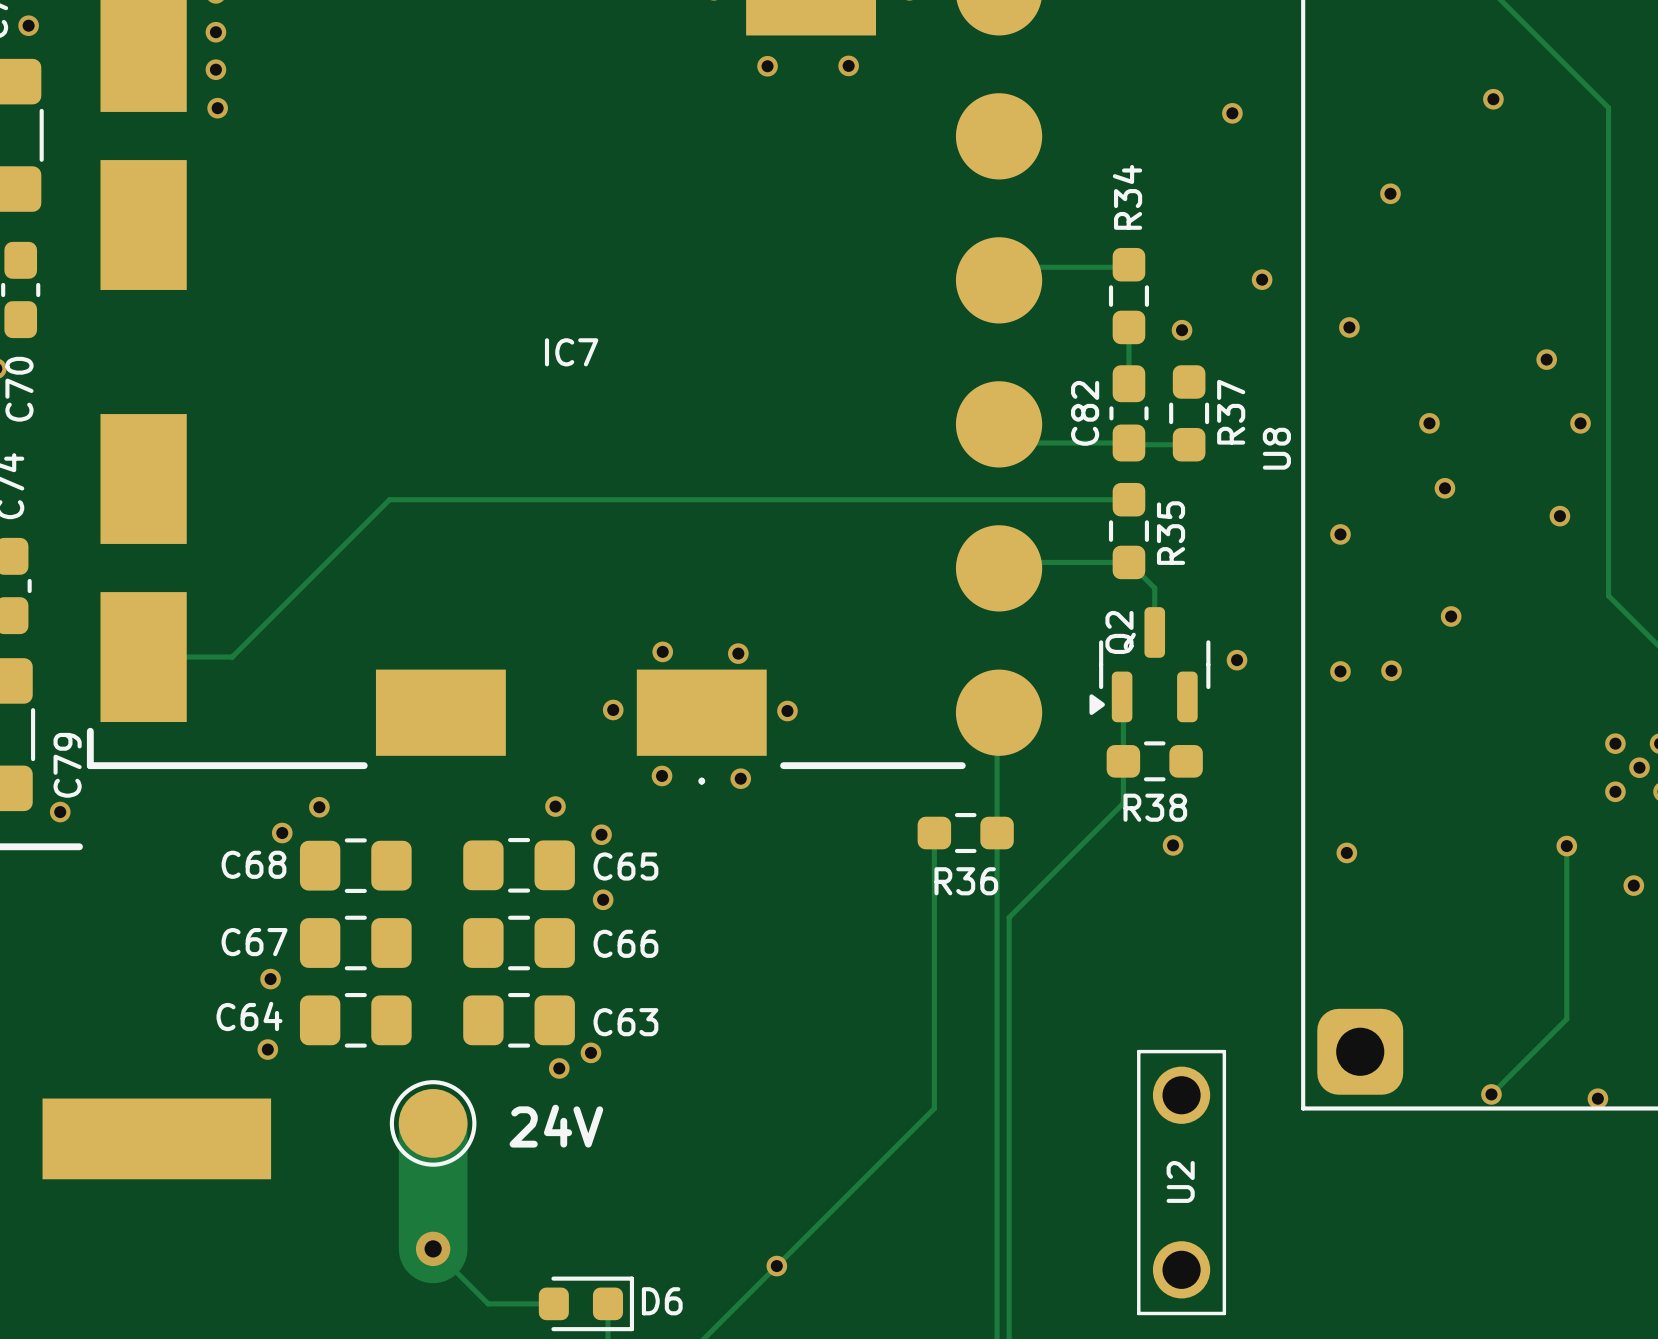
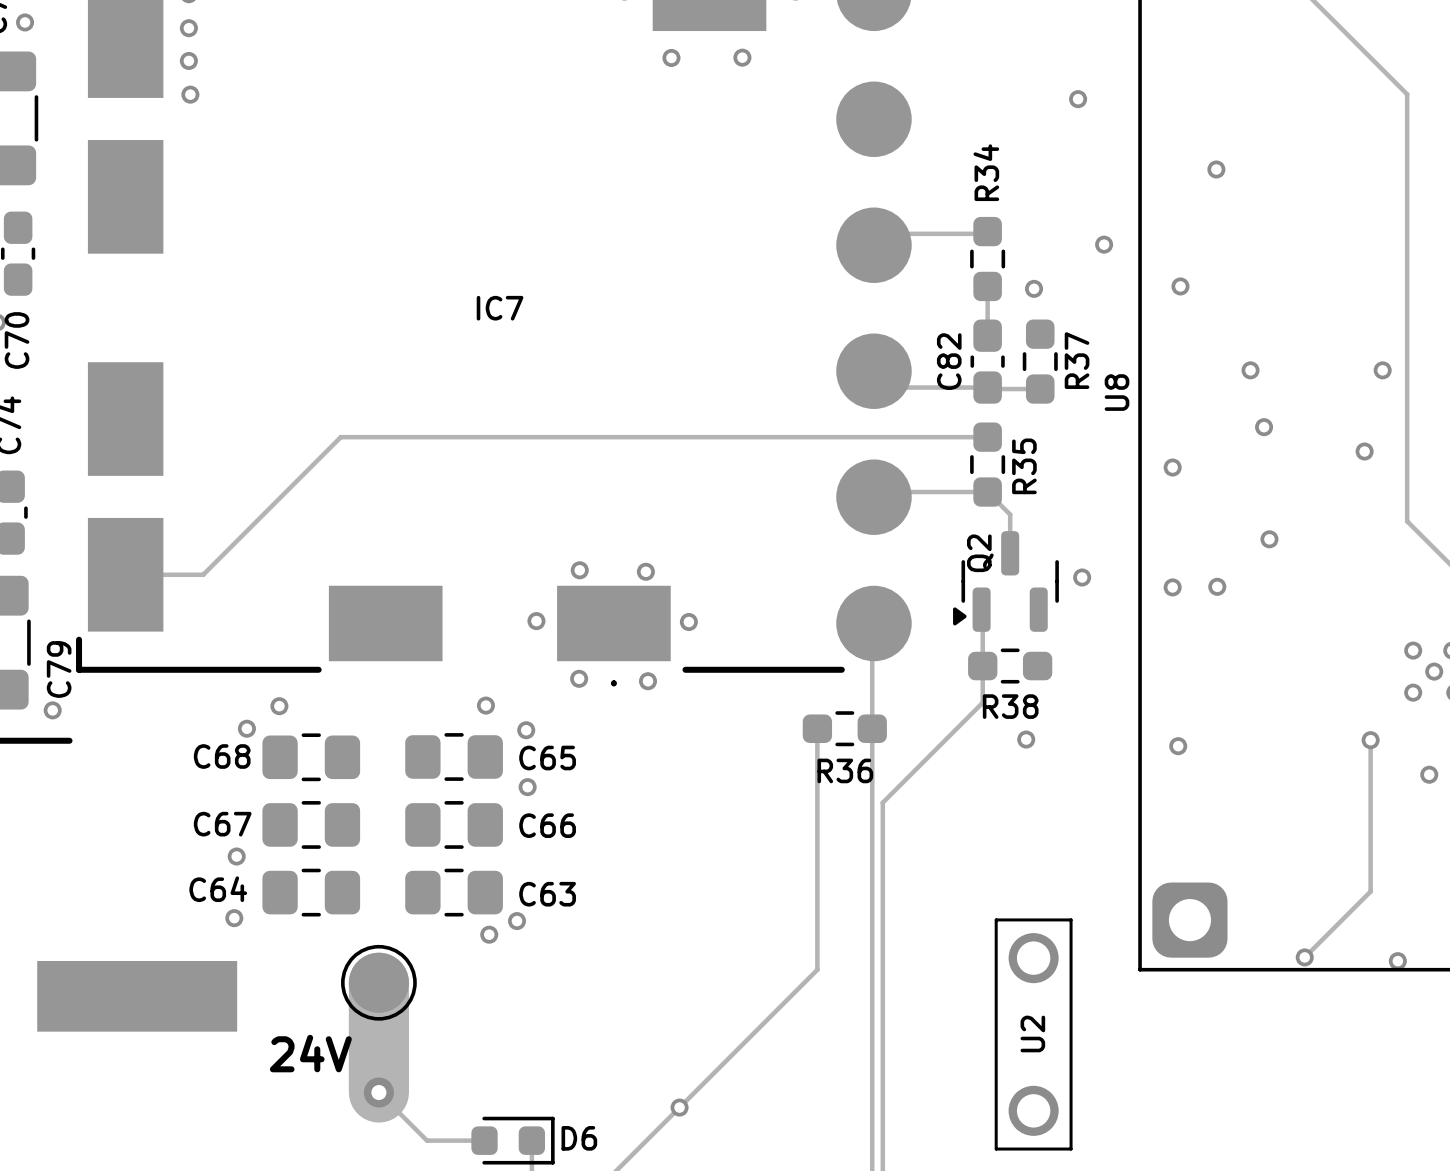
via: (1493, 99) -> none
via: (1546, 359) -> none
text position: 24V (556, 1126) -> 24V (310, 1053)

